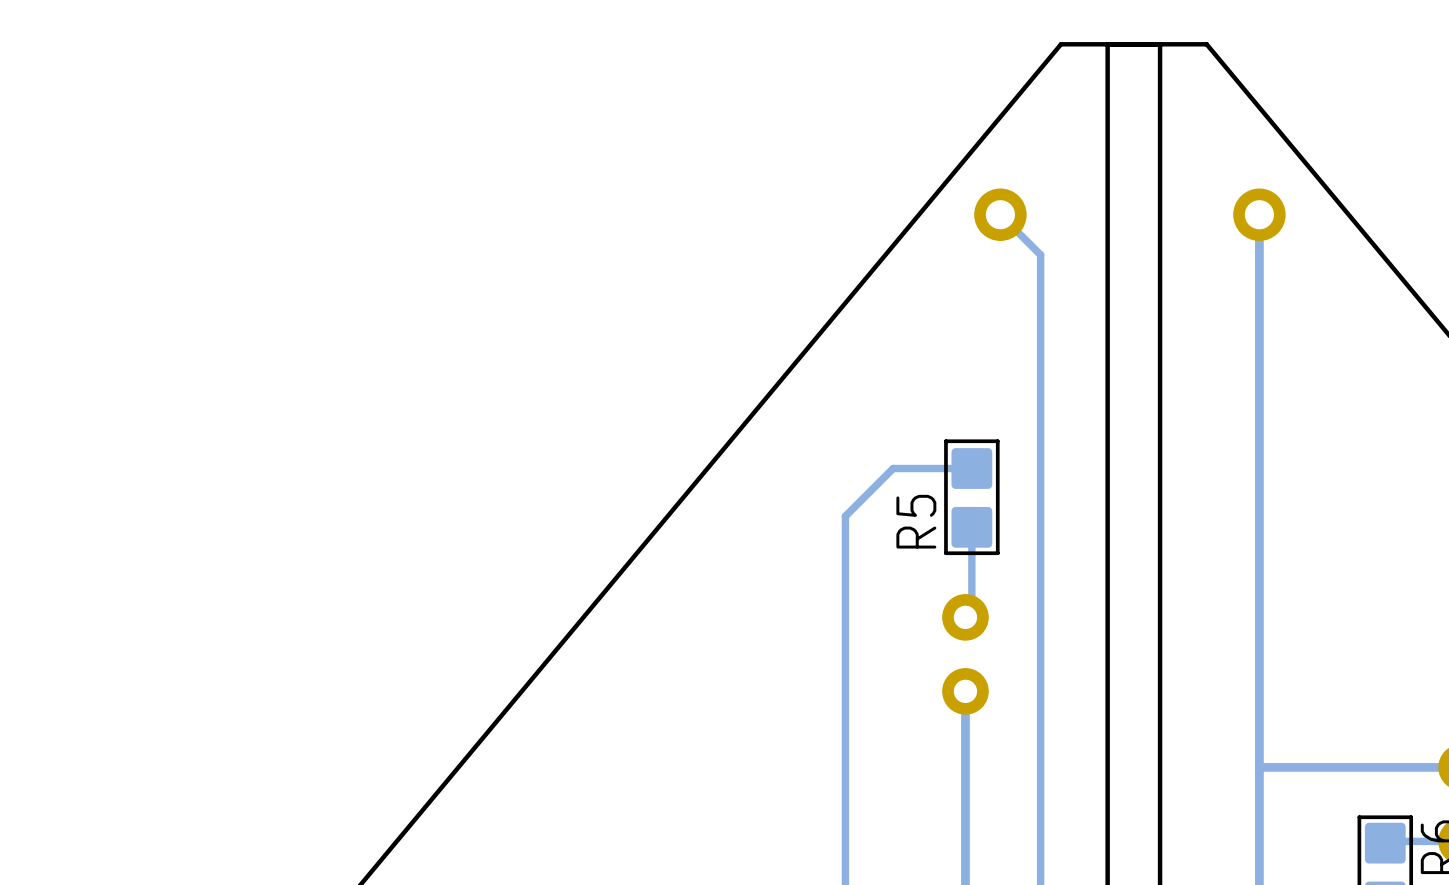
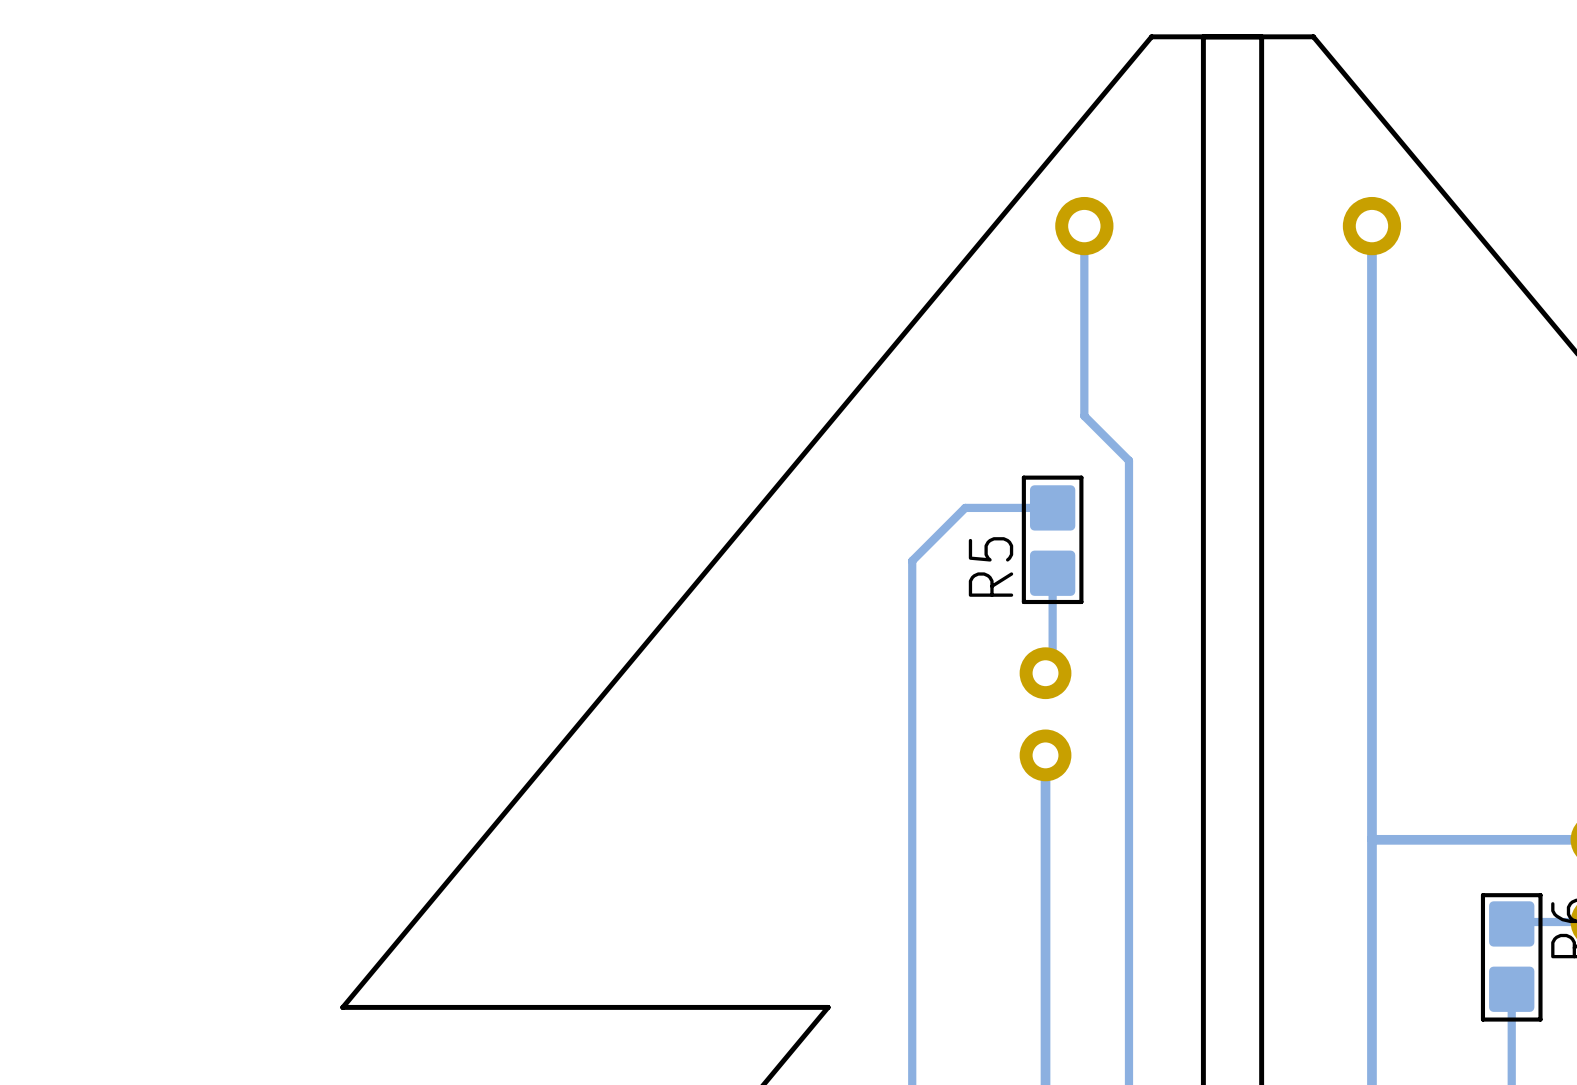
track: (1000, 214) (1040, 254) (1040, 425) -> (1084, 226) (1084, 416) (1128, 460)

